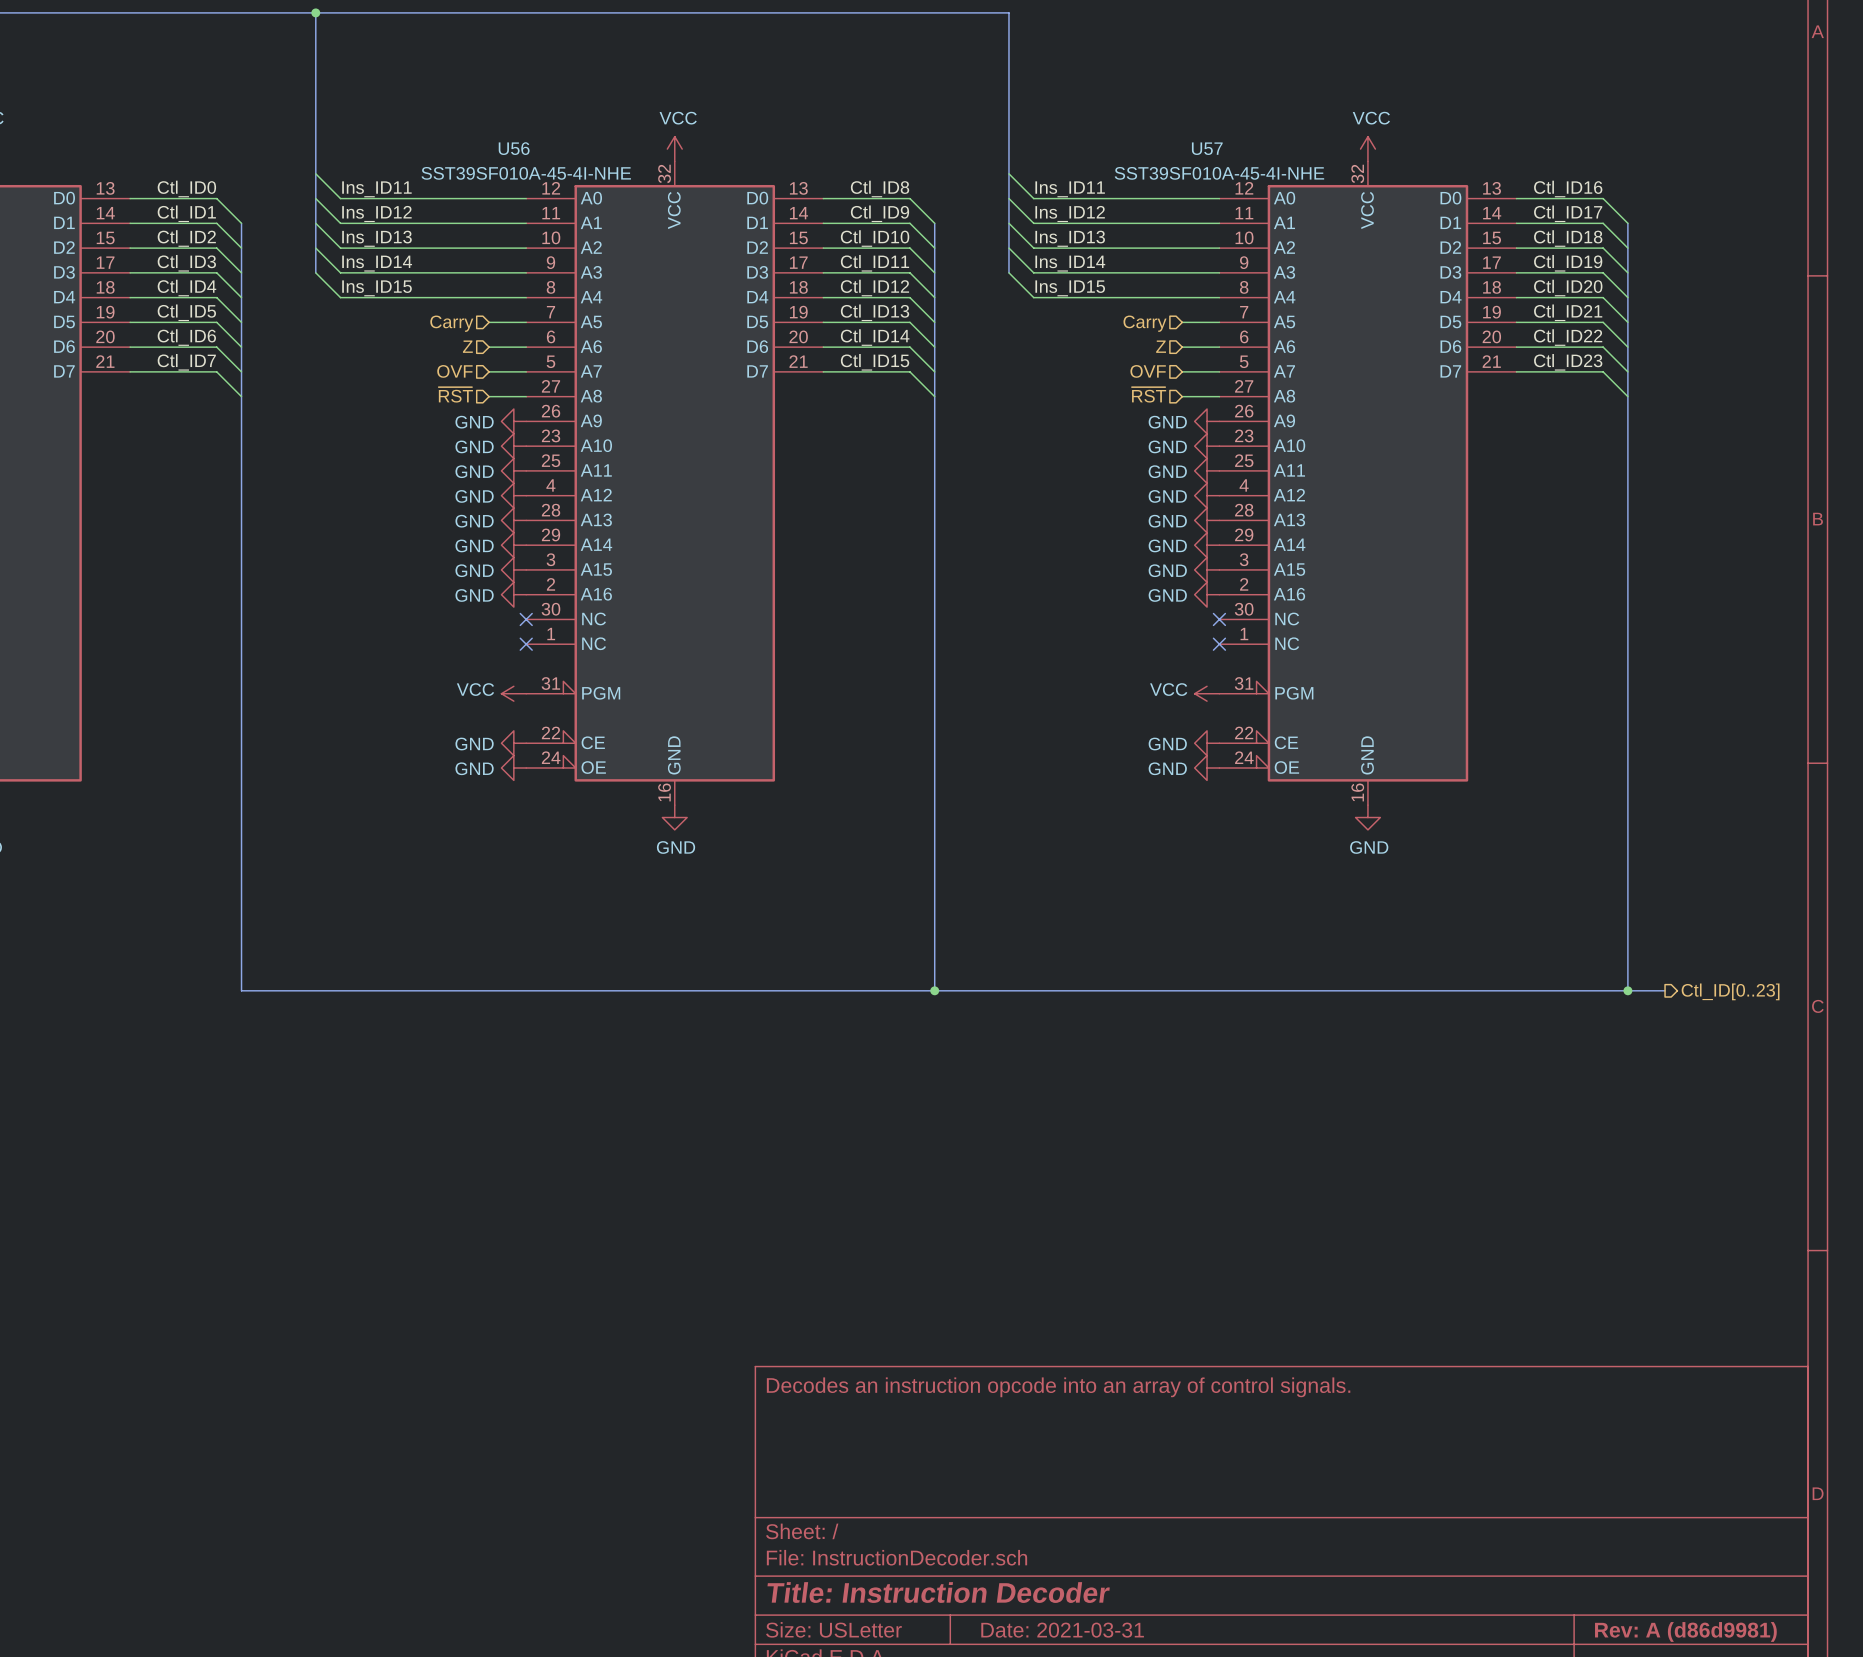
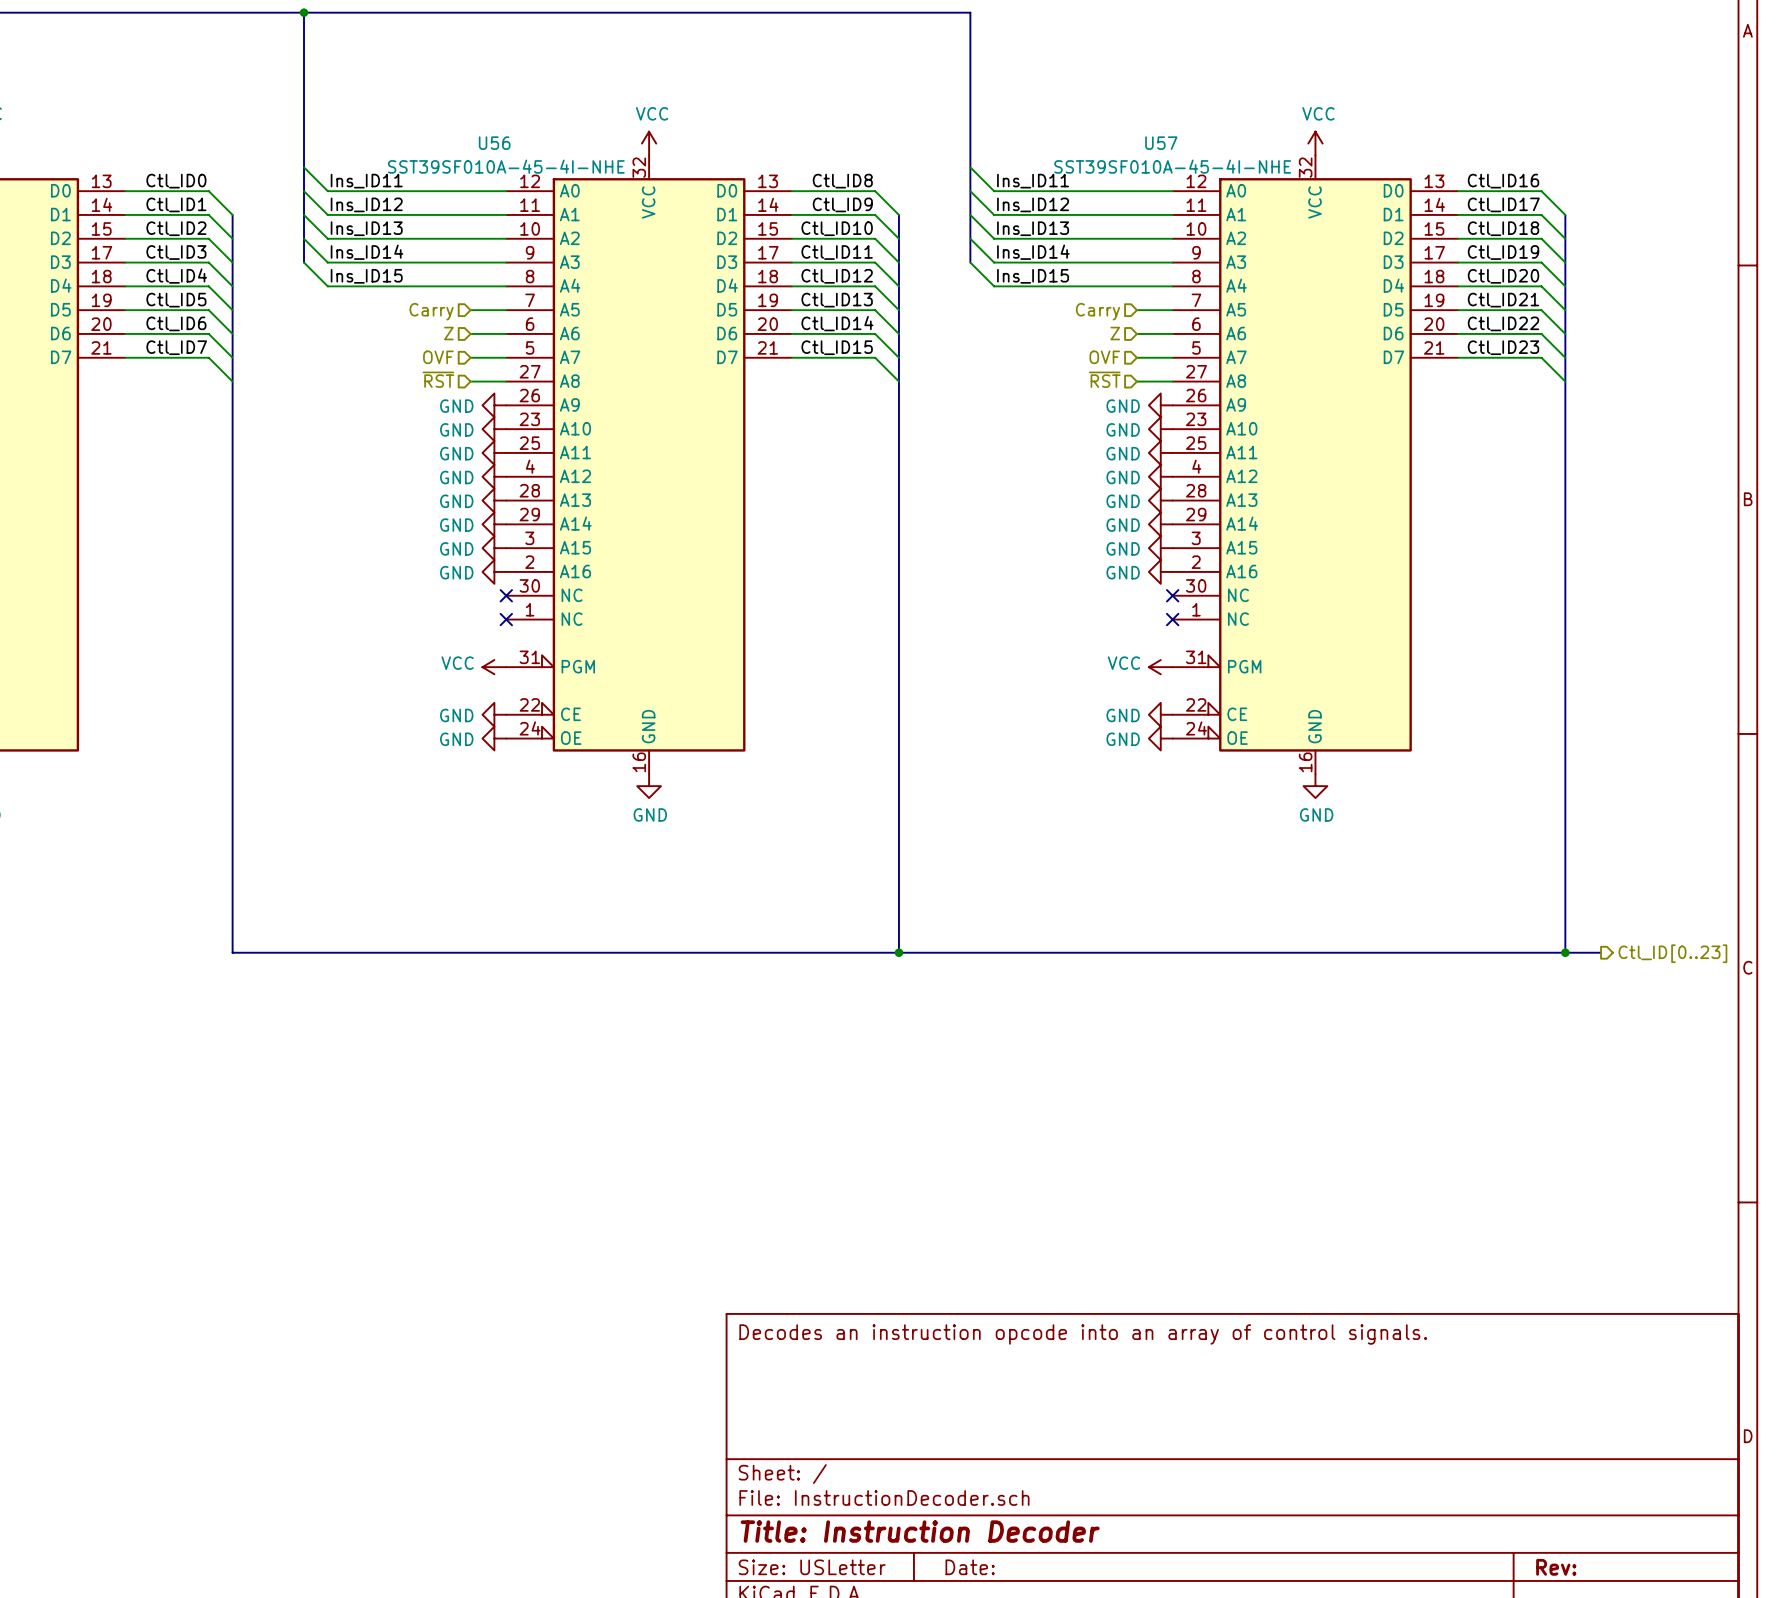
title block: Date: 2021-03-31 (1062, 1630) -> Date: (970, 1567)
title block: Rev: A (d86d9981) (1685, 1631) -> Rev: (1556, 1567)

